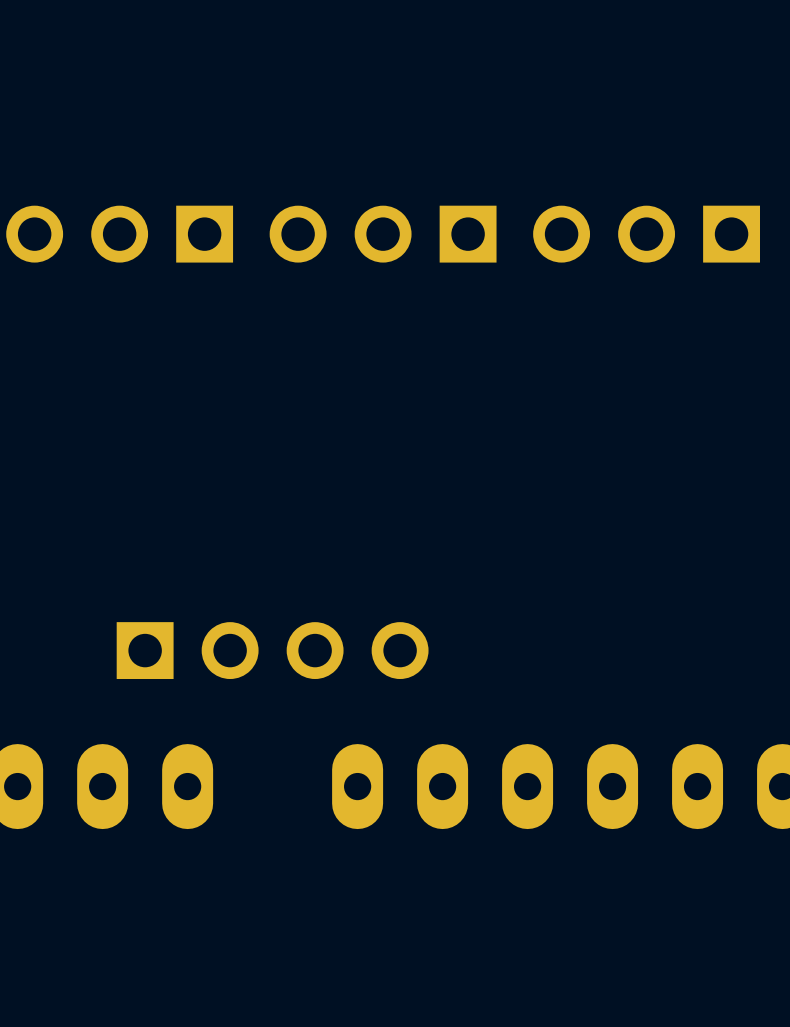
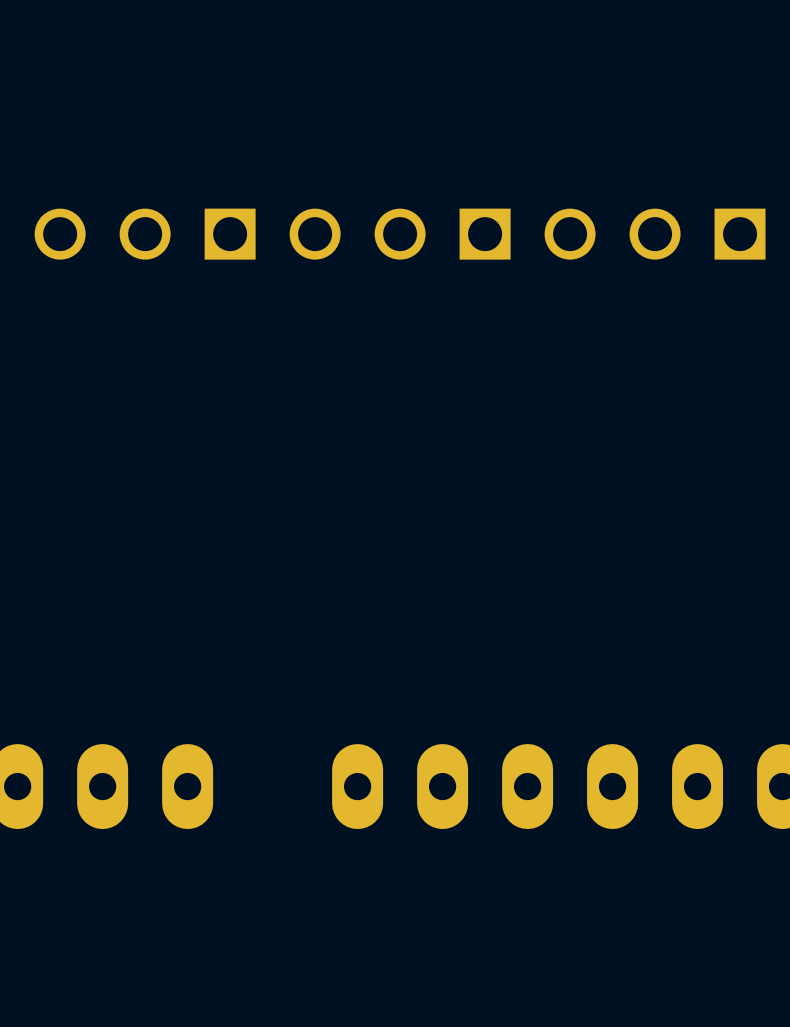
part footprint: [6, 205, 234, 263] -> [34, 208, 256, 260]
part footprint: [269, 205, 497, 263] -> [289, 208, 511, 260]
part footprint: [533, 205, 760, 263] -> [544, 208, 766, 260]
part: (272, 650) -> none

